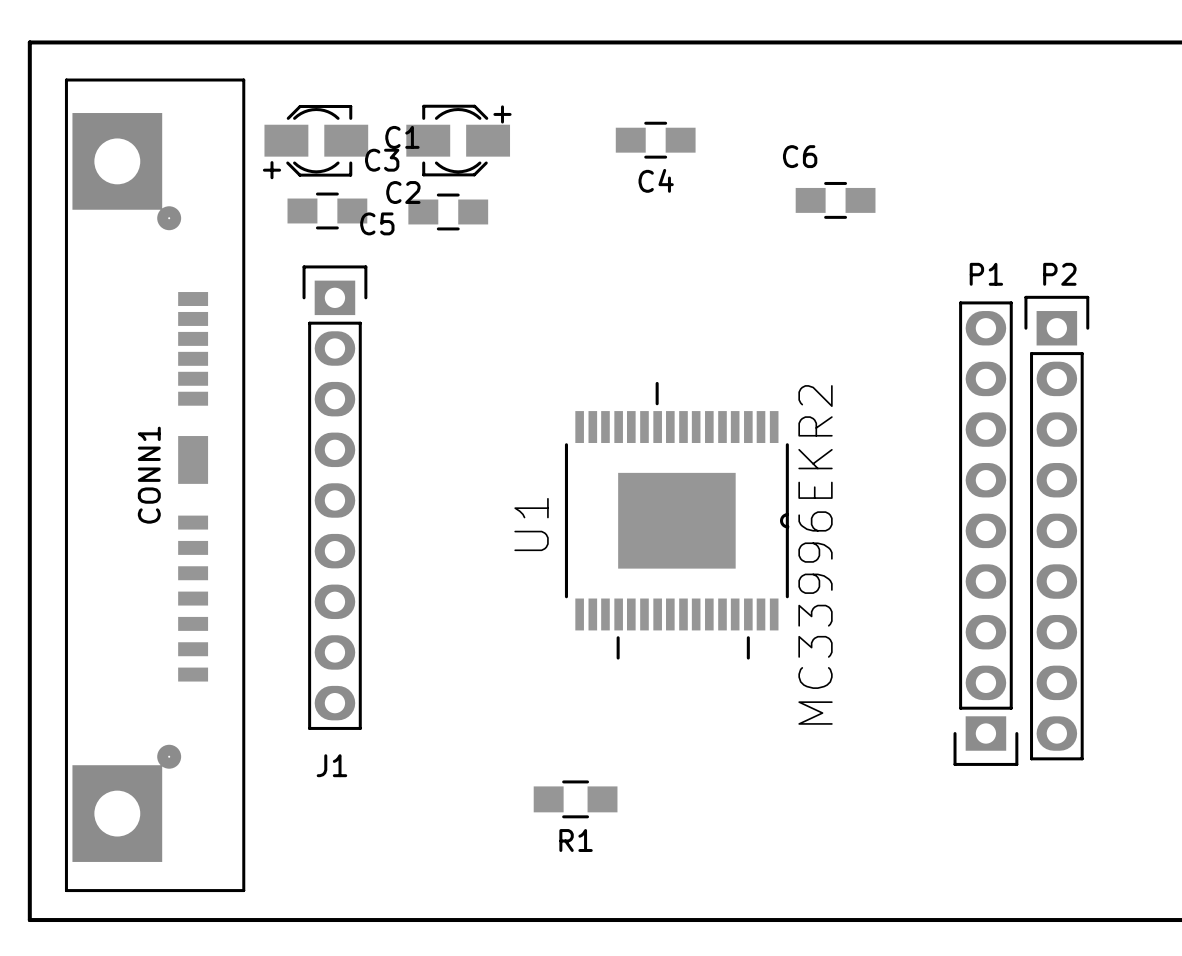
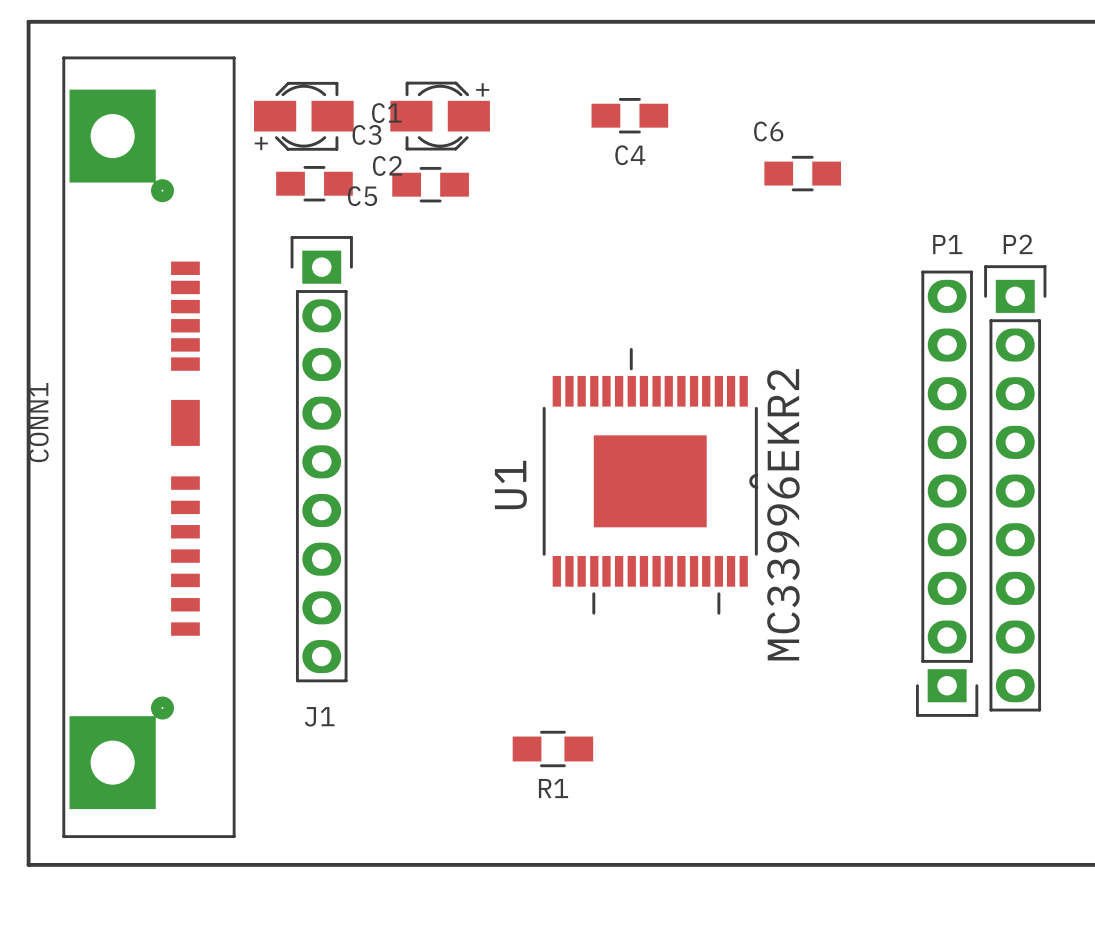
CONN1 name position: CONN1 (149, 475) -> CONN1 (38, 422)

